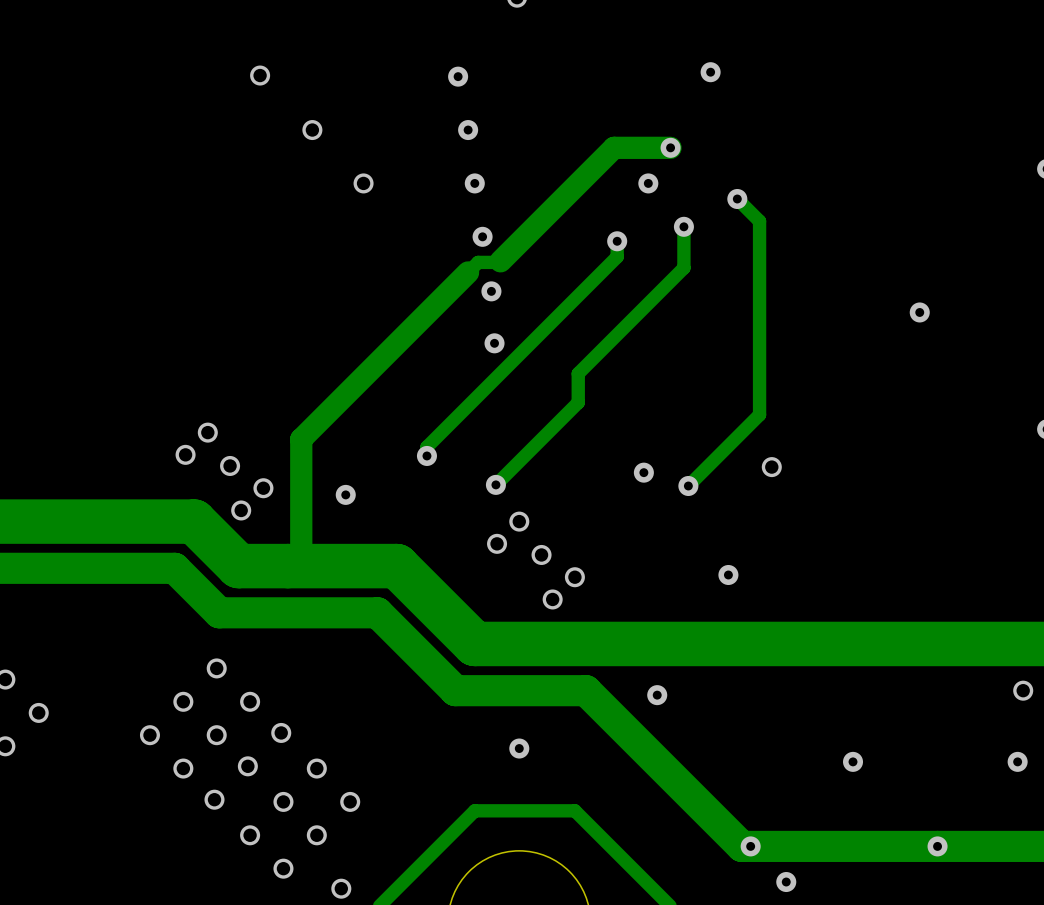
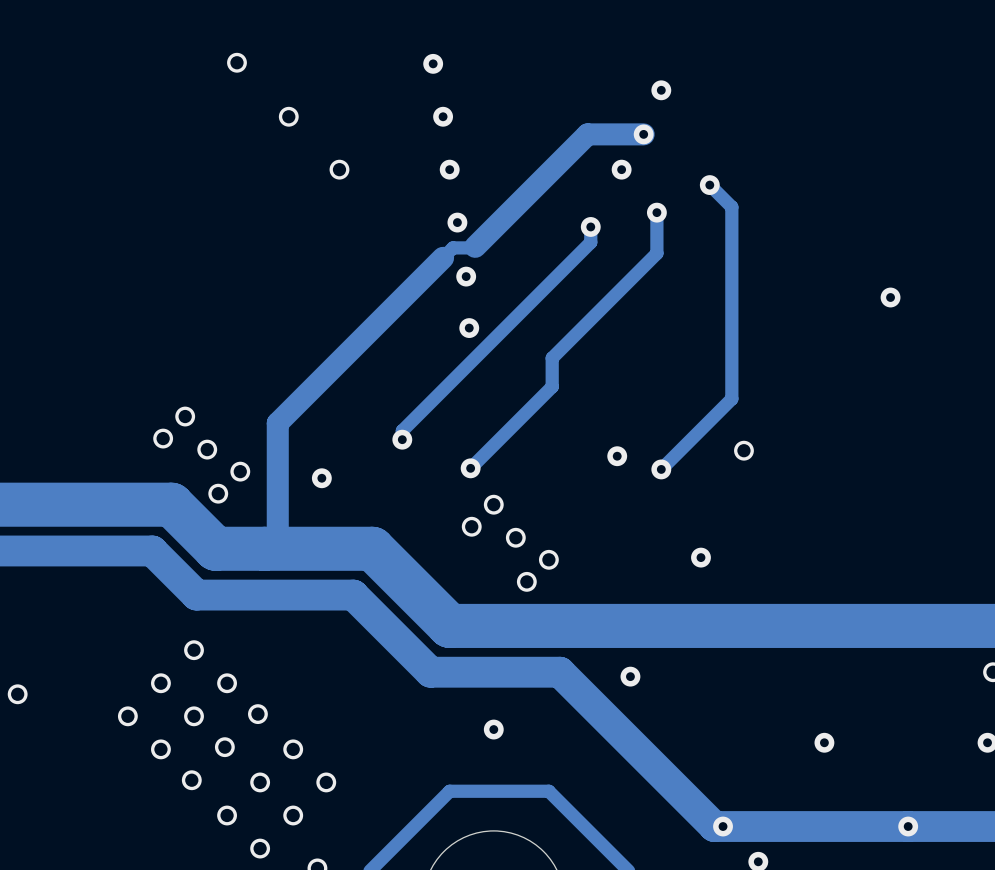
via position: (710, 72) -> (661, 90)

